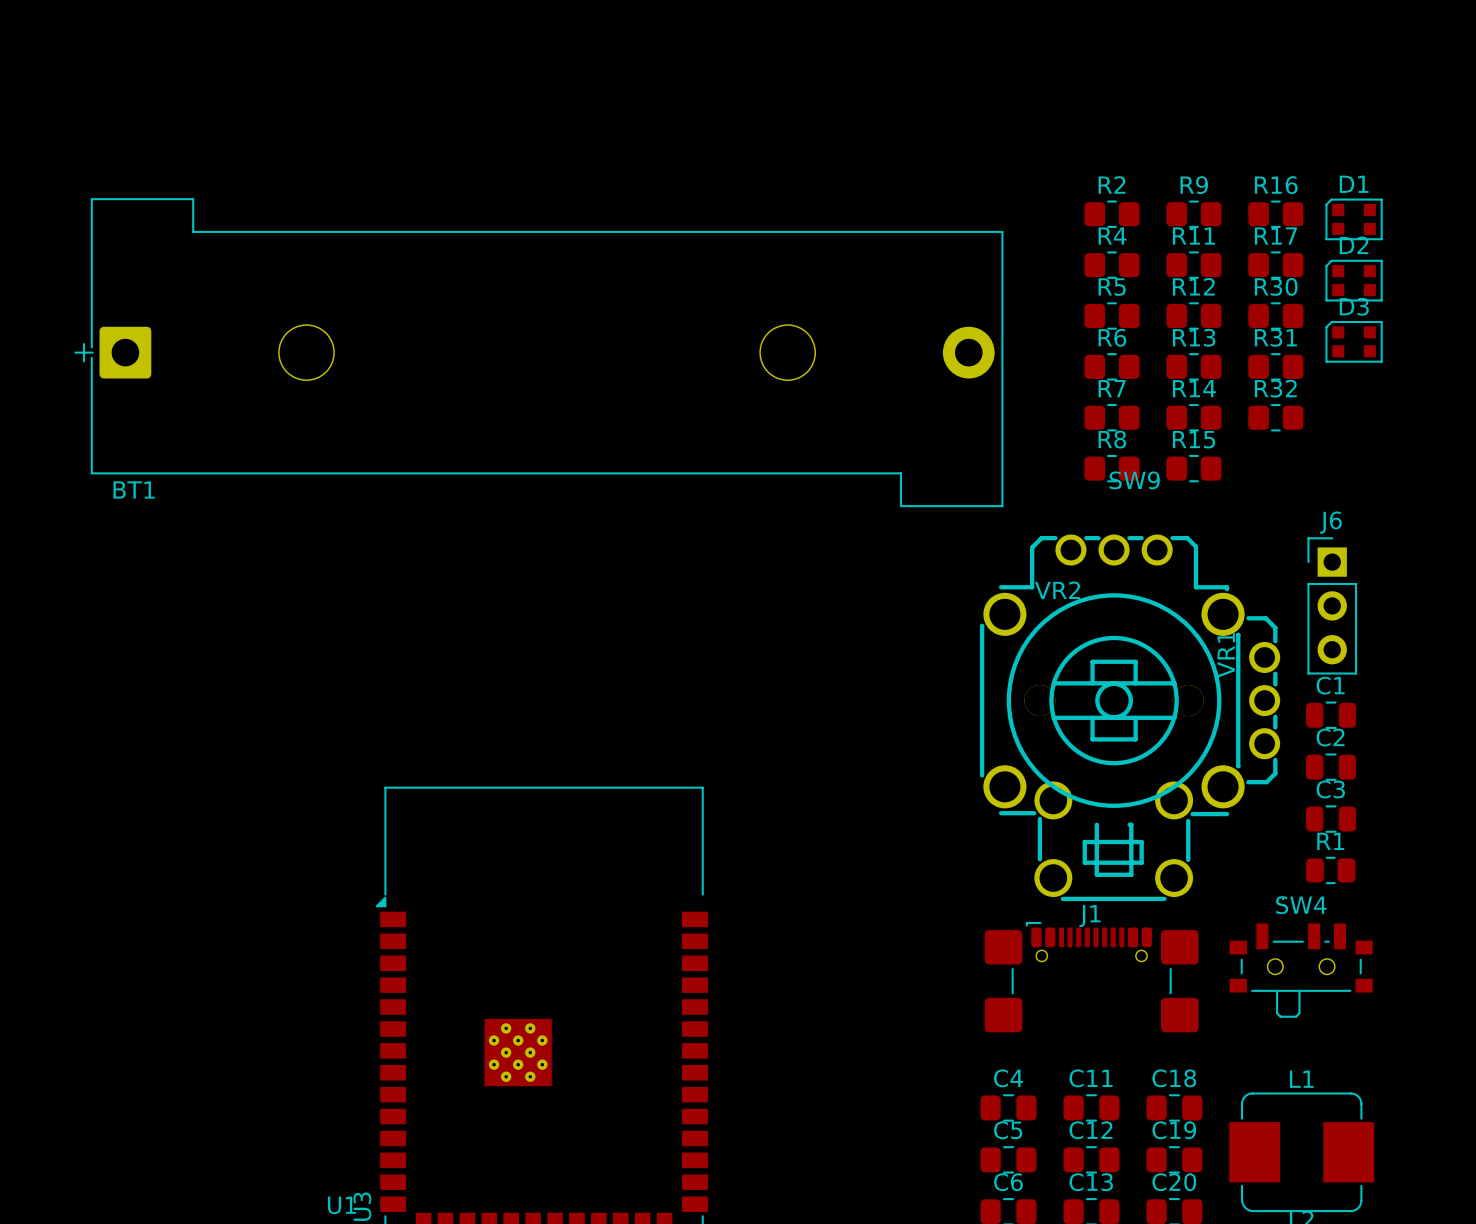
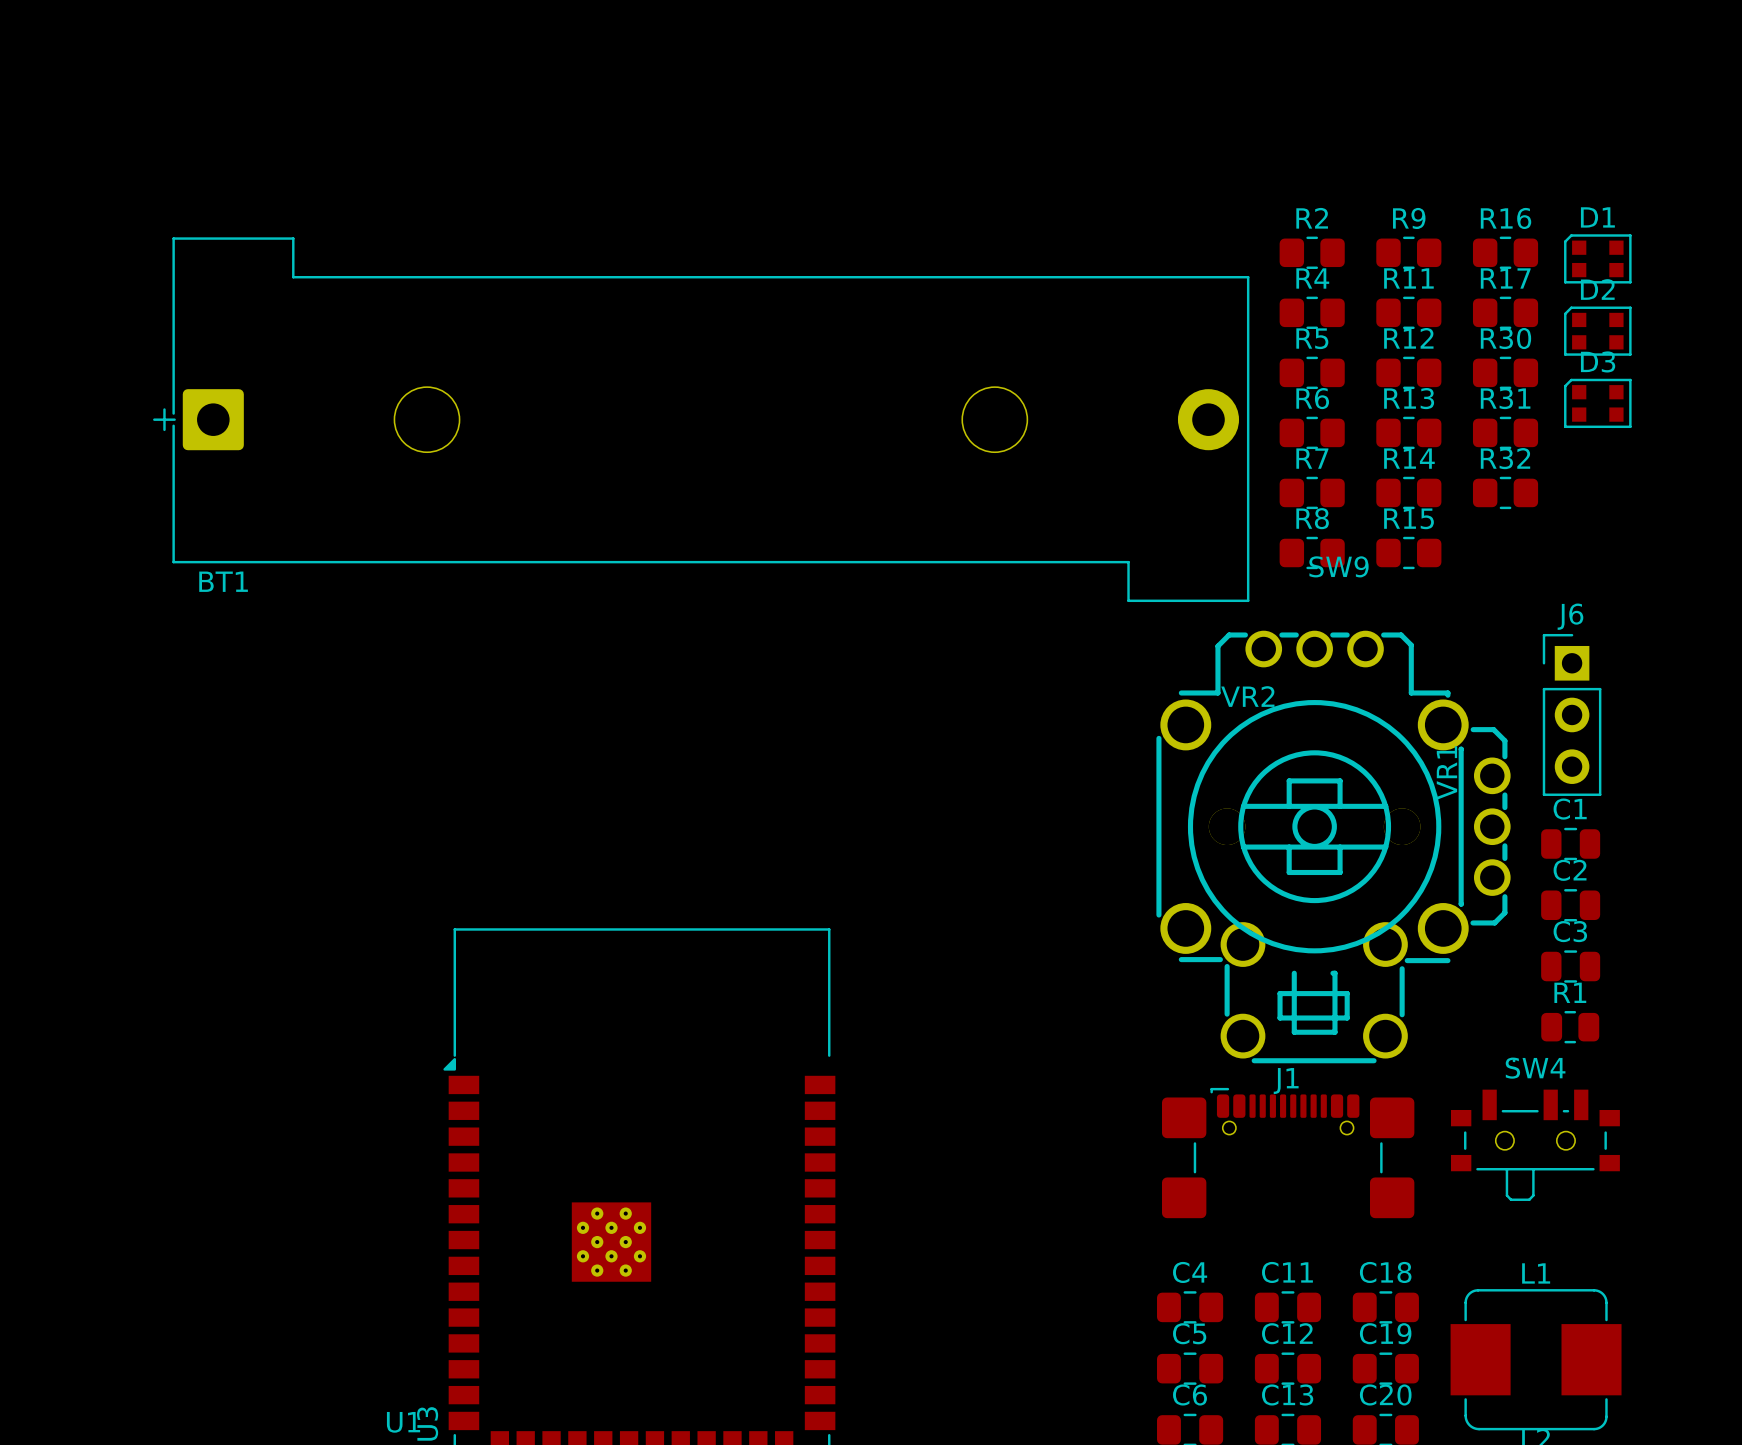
BT1 position: (538, 352) -> (701, 419)

